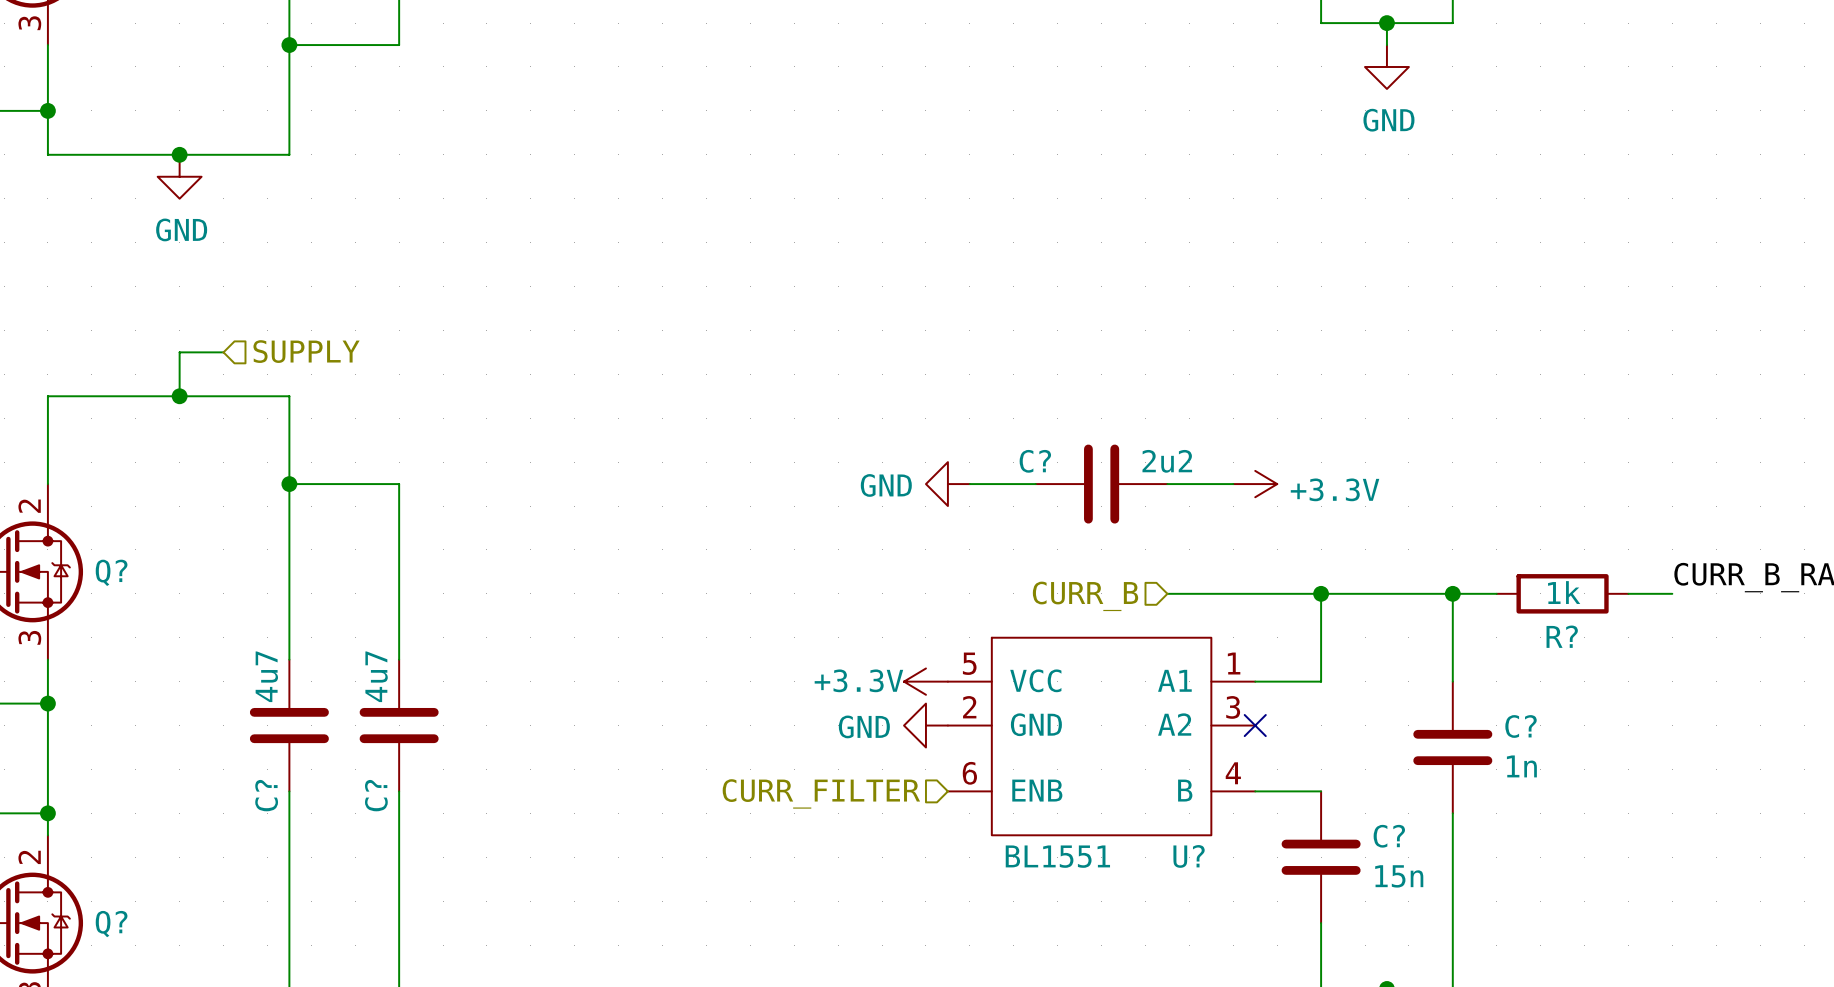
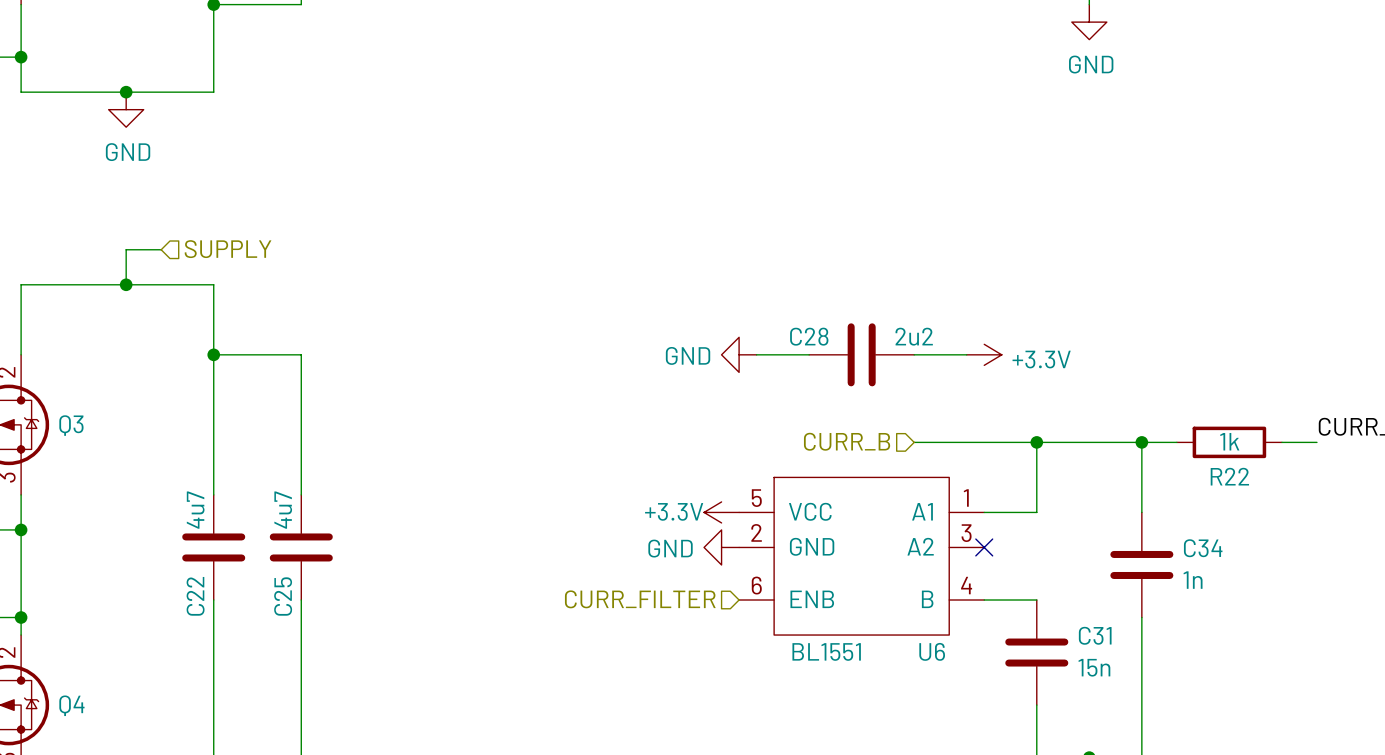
C? name: C? (1035, 461) -> C28 (809, 336)
Q? name: Q? (111, 572) -> Q3 (71, 425)
R? name: R? (1562, 636) -> R22 (1229, 476)
C? name: C? (1521, 726) -> C34 (1203, 548)
C? name: C? (266, 795) -> C22 (195, 596)
C? name: C? (376, 795) -> C25 (283, 596)
C? name: C? (1389, 836) -> C31 (1095, 635)
U? name: U? (1189, 856) -> U6 (932, 651)
Q? name: Q? (111, 924) -> Q4 (71, 705)

